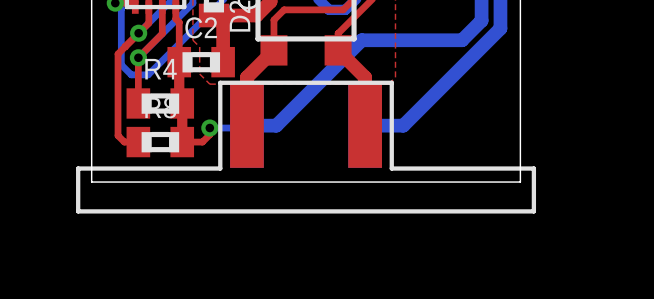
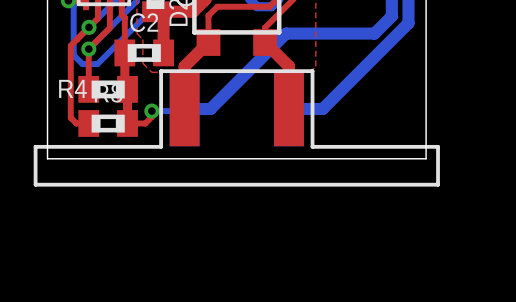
R4 name position: R4 (161, 69) -> R4 (72, 88)

